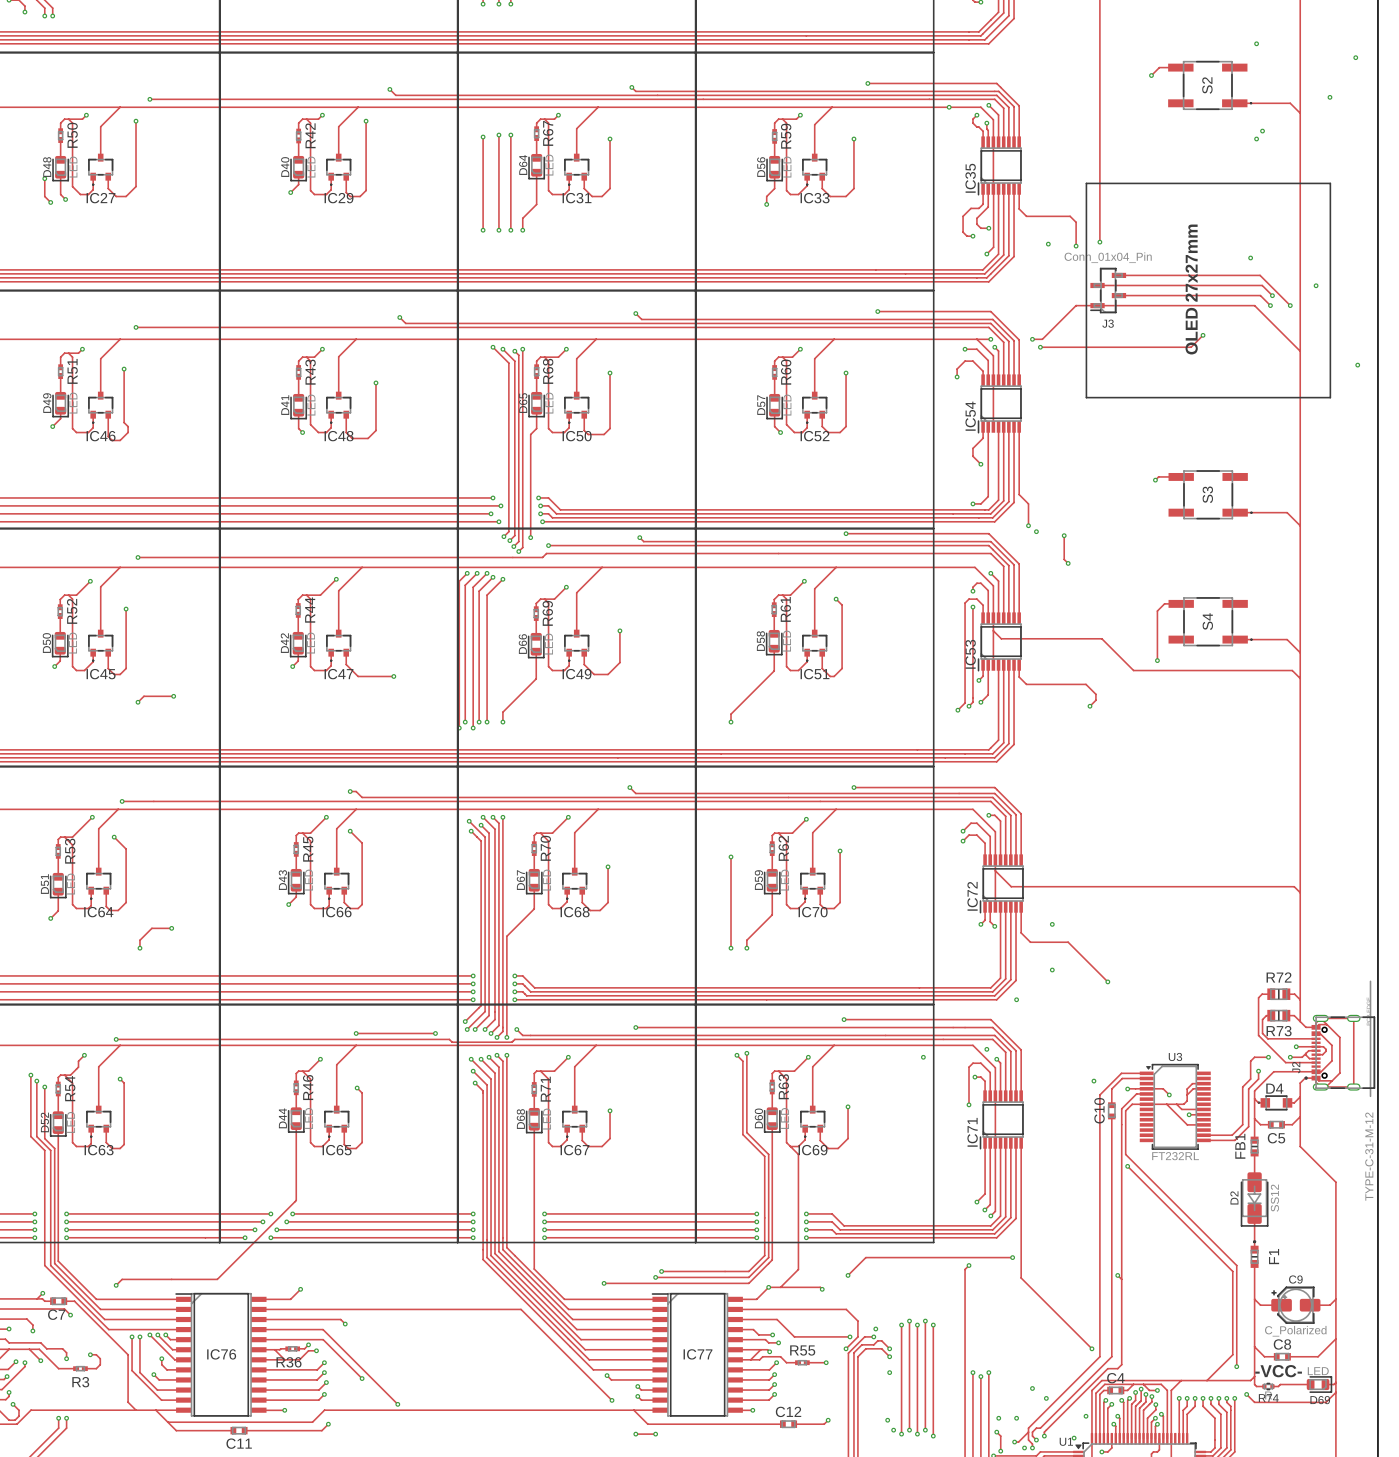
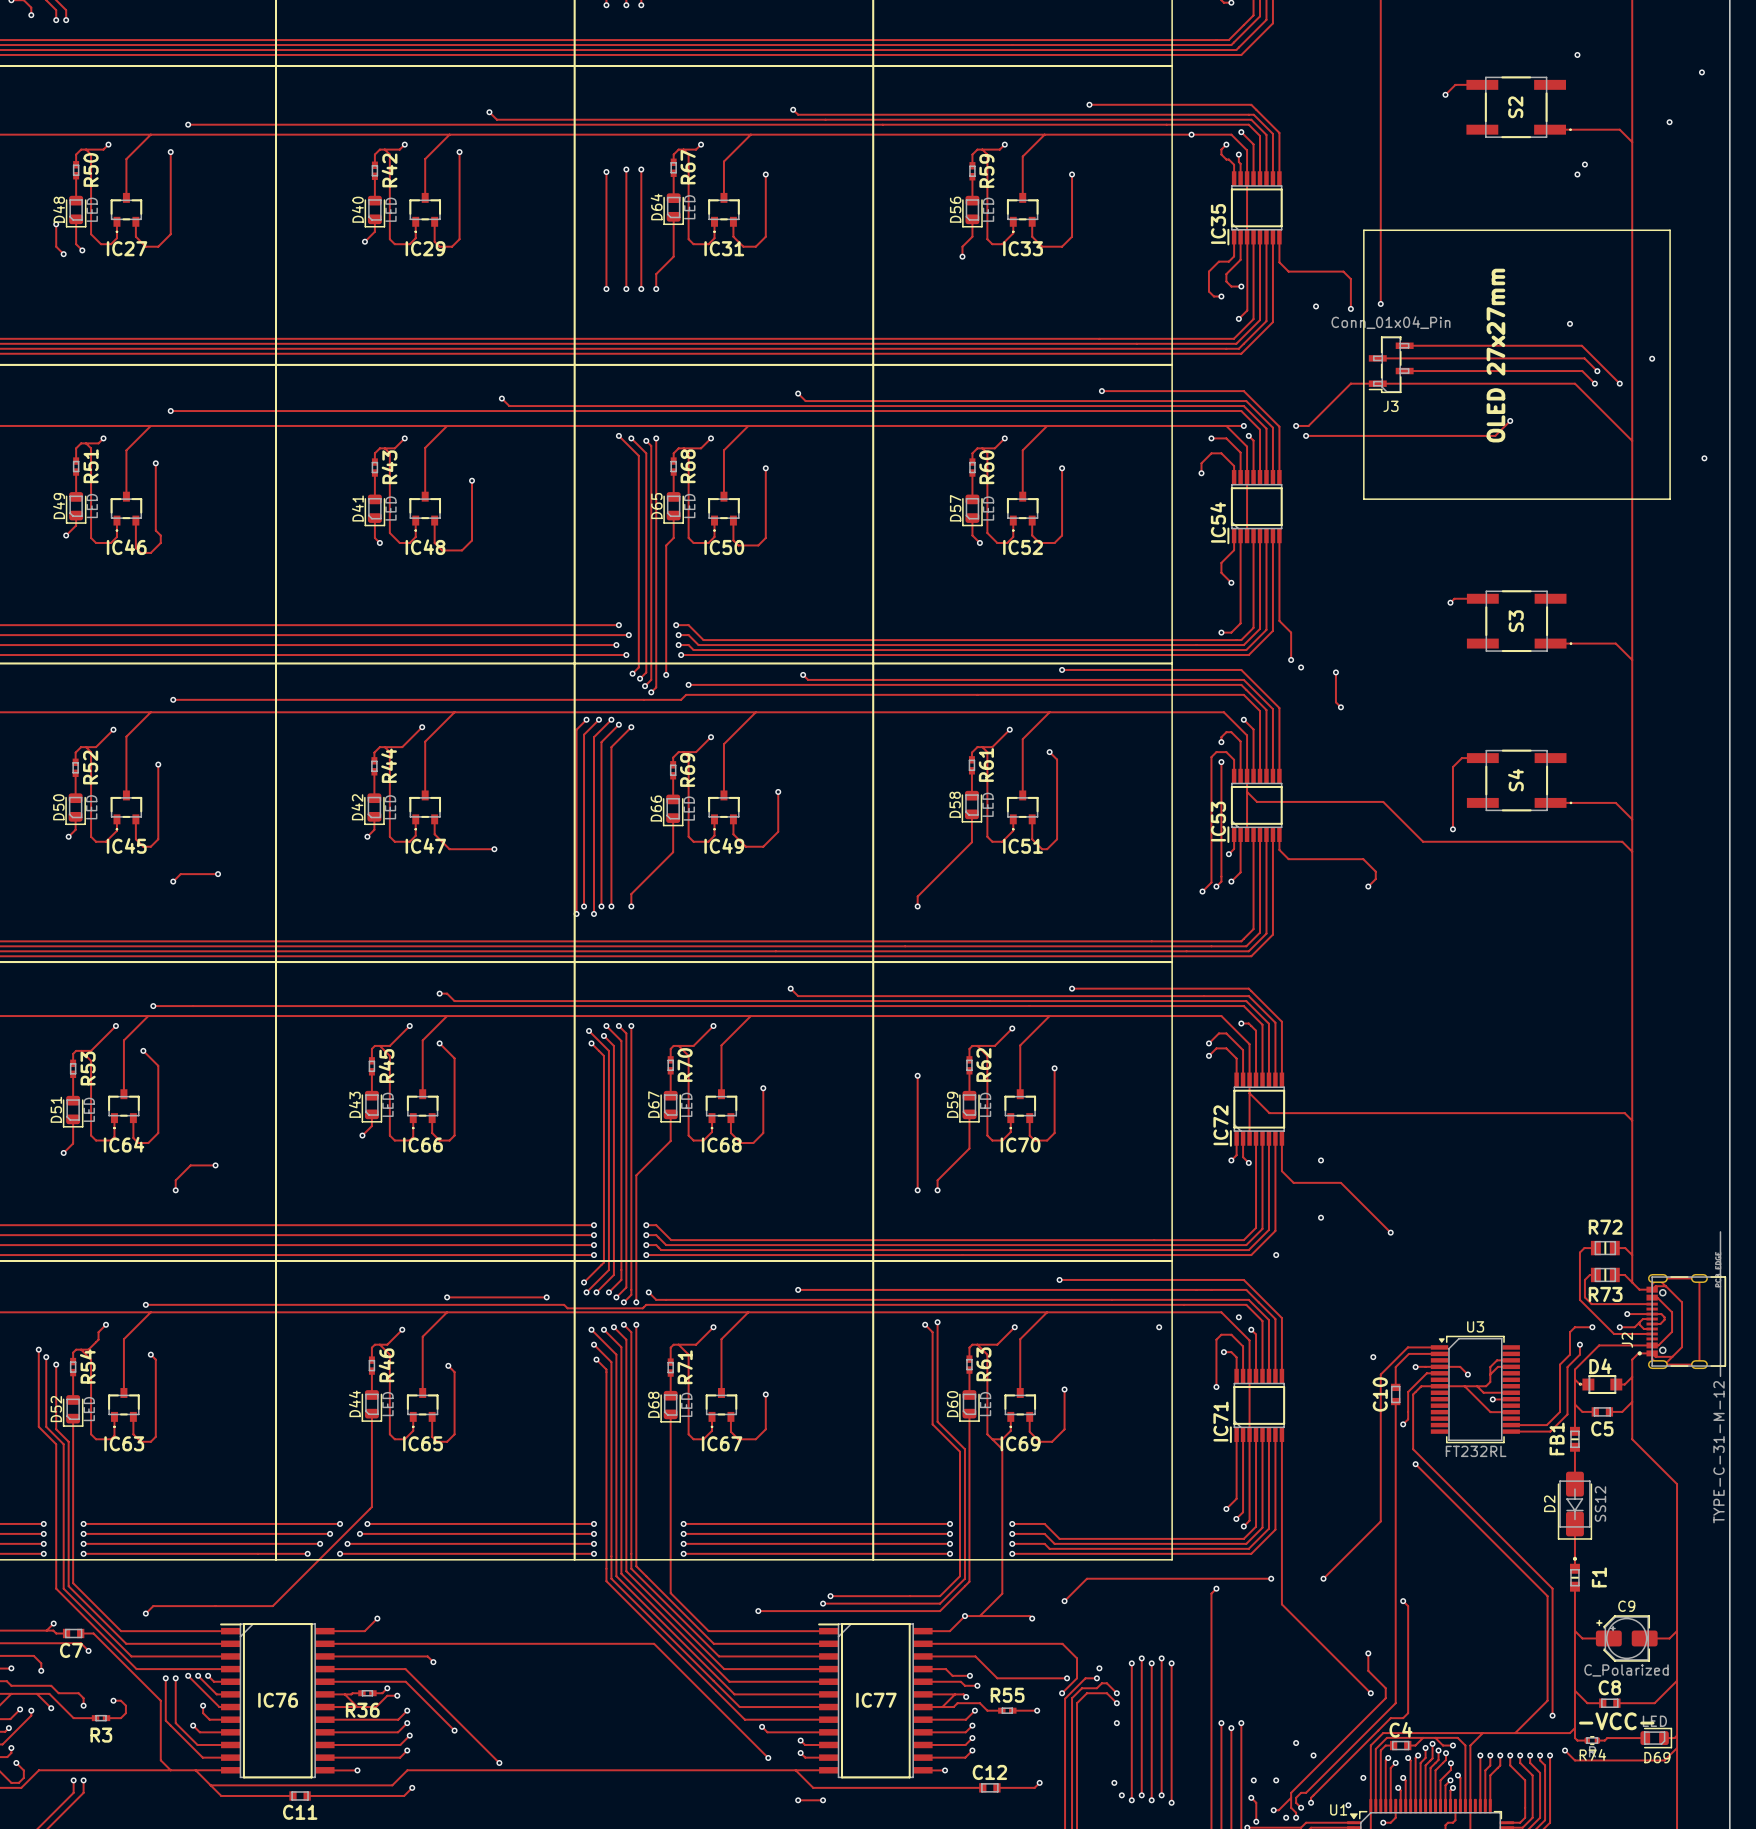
track: (1121, 1130) (1121, 1279) -> (1408, 1419) (1403, 1424)
via: none -> (1403, 1424)
track: (1099, 1211) (1099, 1356) -> (1368, 1653) (1368, 1670) (1385, 1688) (1385, 1698) (1380, 1703)
track: none -> (1380, 1521) (1323, 1578)
via: none -> (1323, 1578)
via: none -> (1368, 1653)

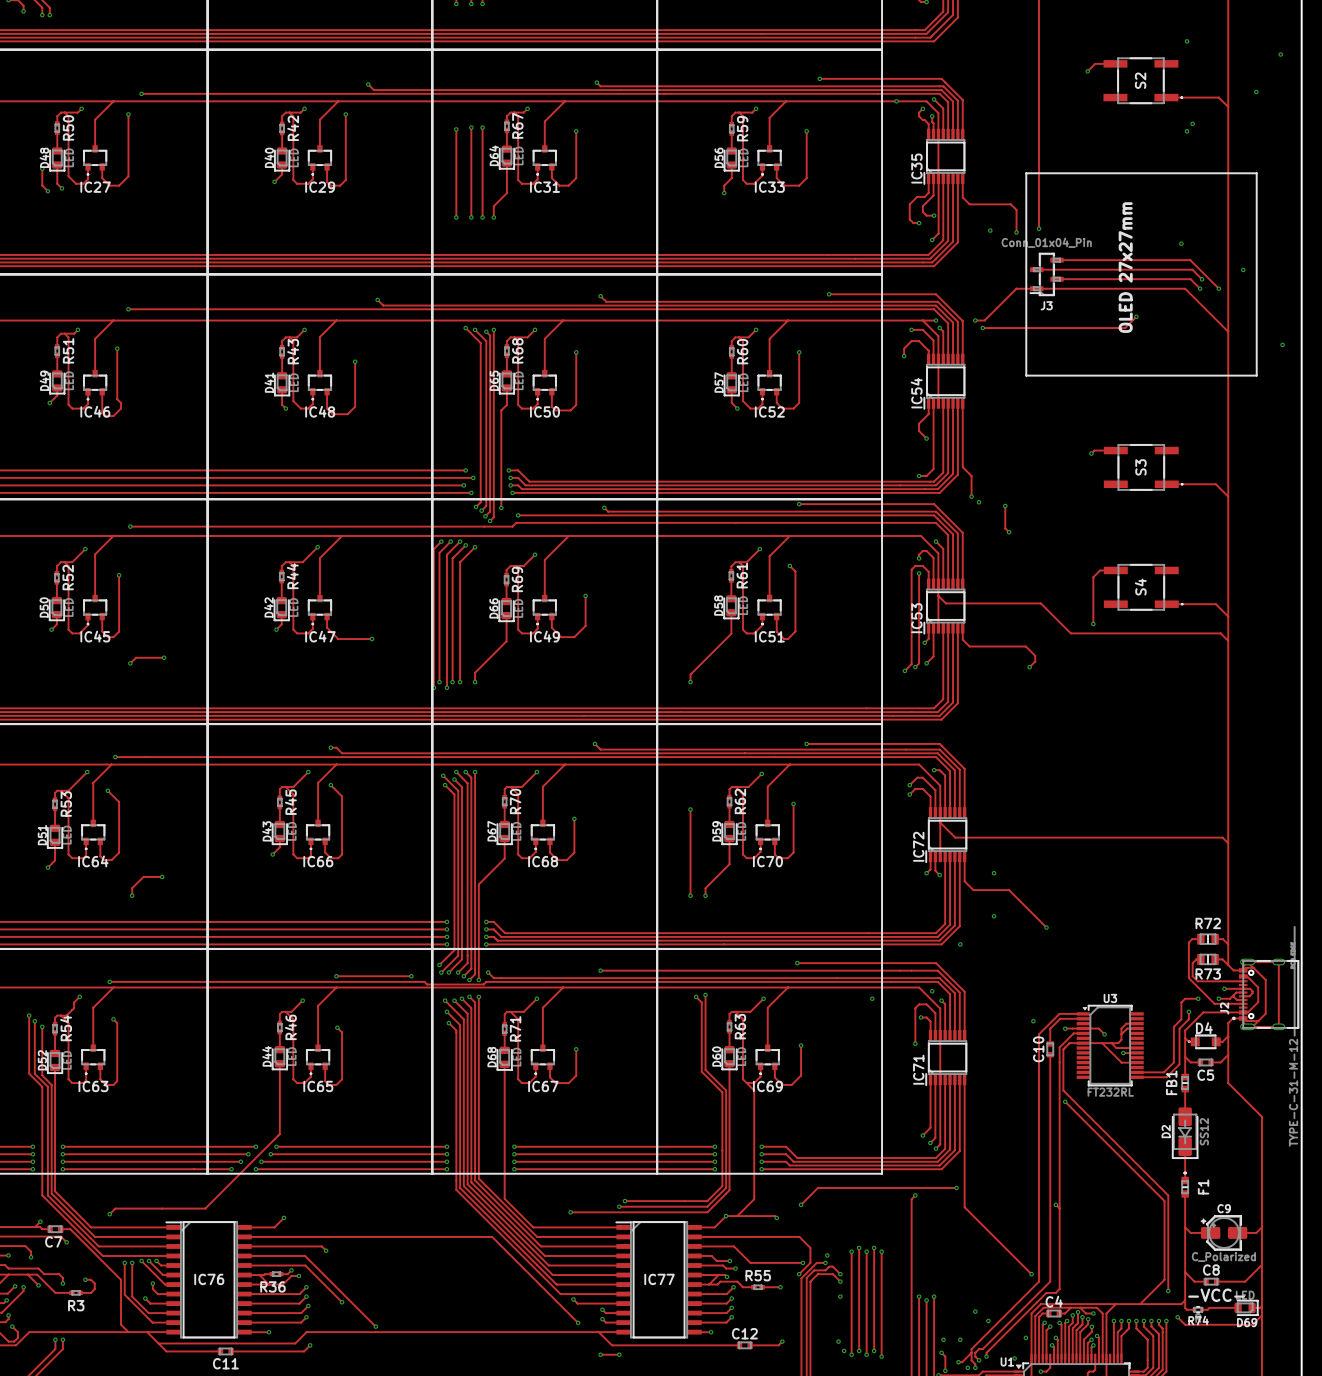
track: (1408, 1419) (1403, 1424) -> (1059, 1068) (1059, 1208)
via: (1403, 1424) -> none
track: (1380, 1521) (1323, 1578) -> none
via: (1323, 1578) -> none
track: (1368, 1653) (1368, 1670) (1385, 1688) (1385, 1698) (1380, 1703) -> (1039, 1144) (1039, 1281)
via: (1368, 1653) -> none

